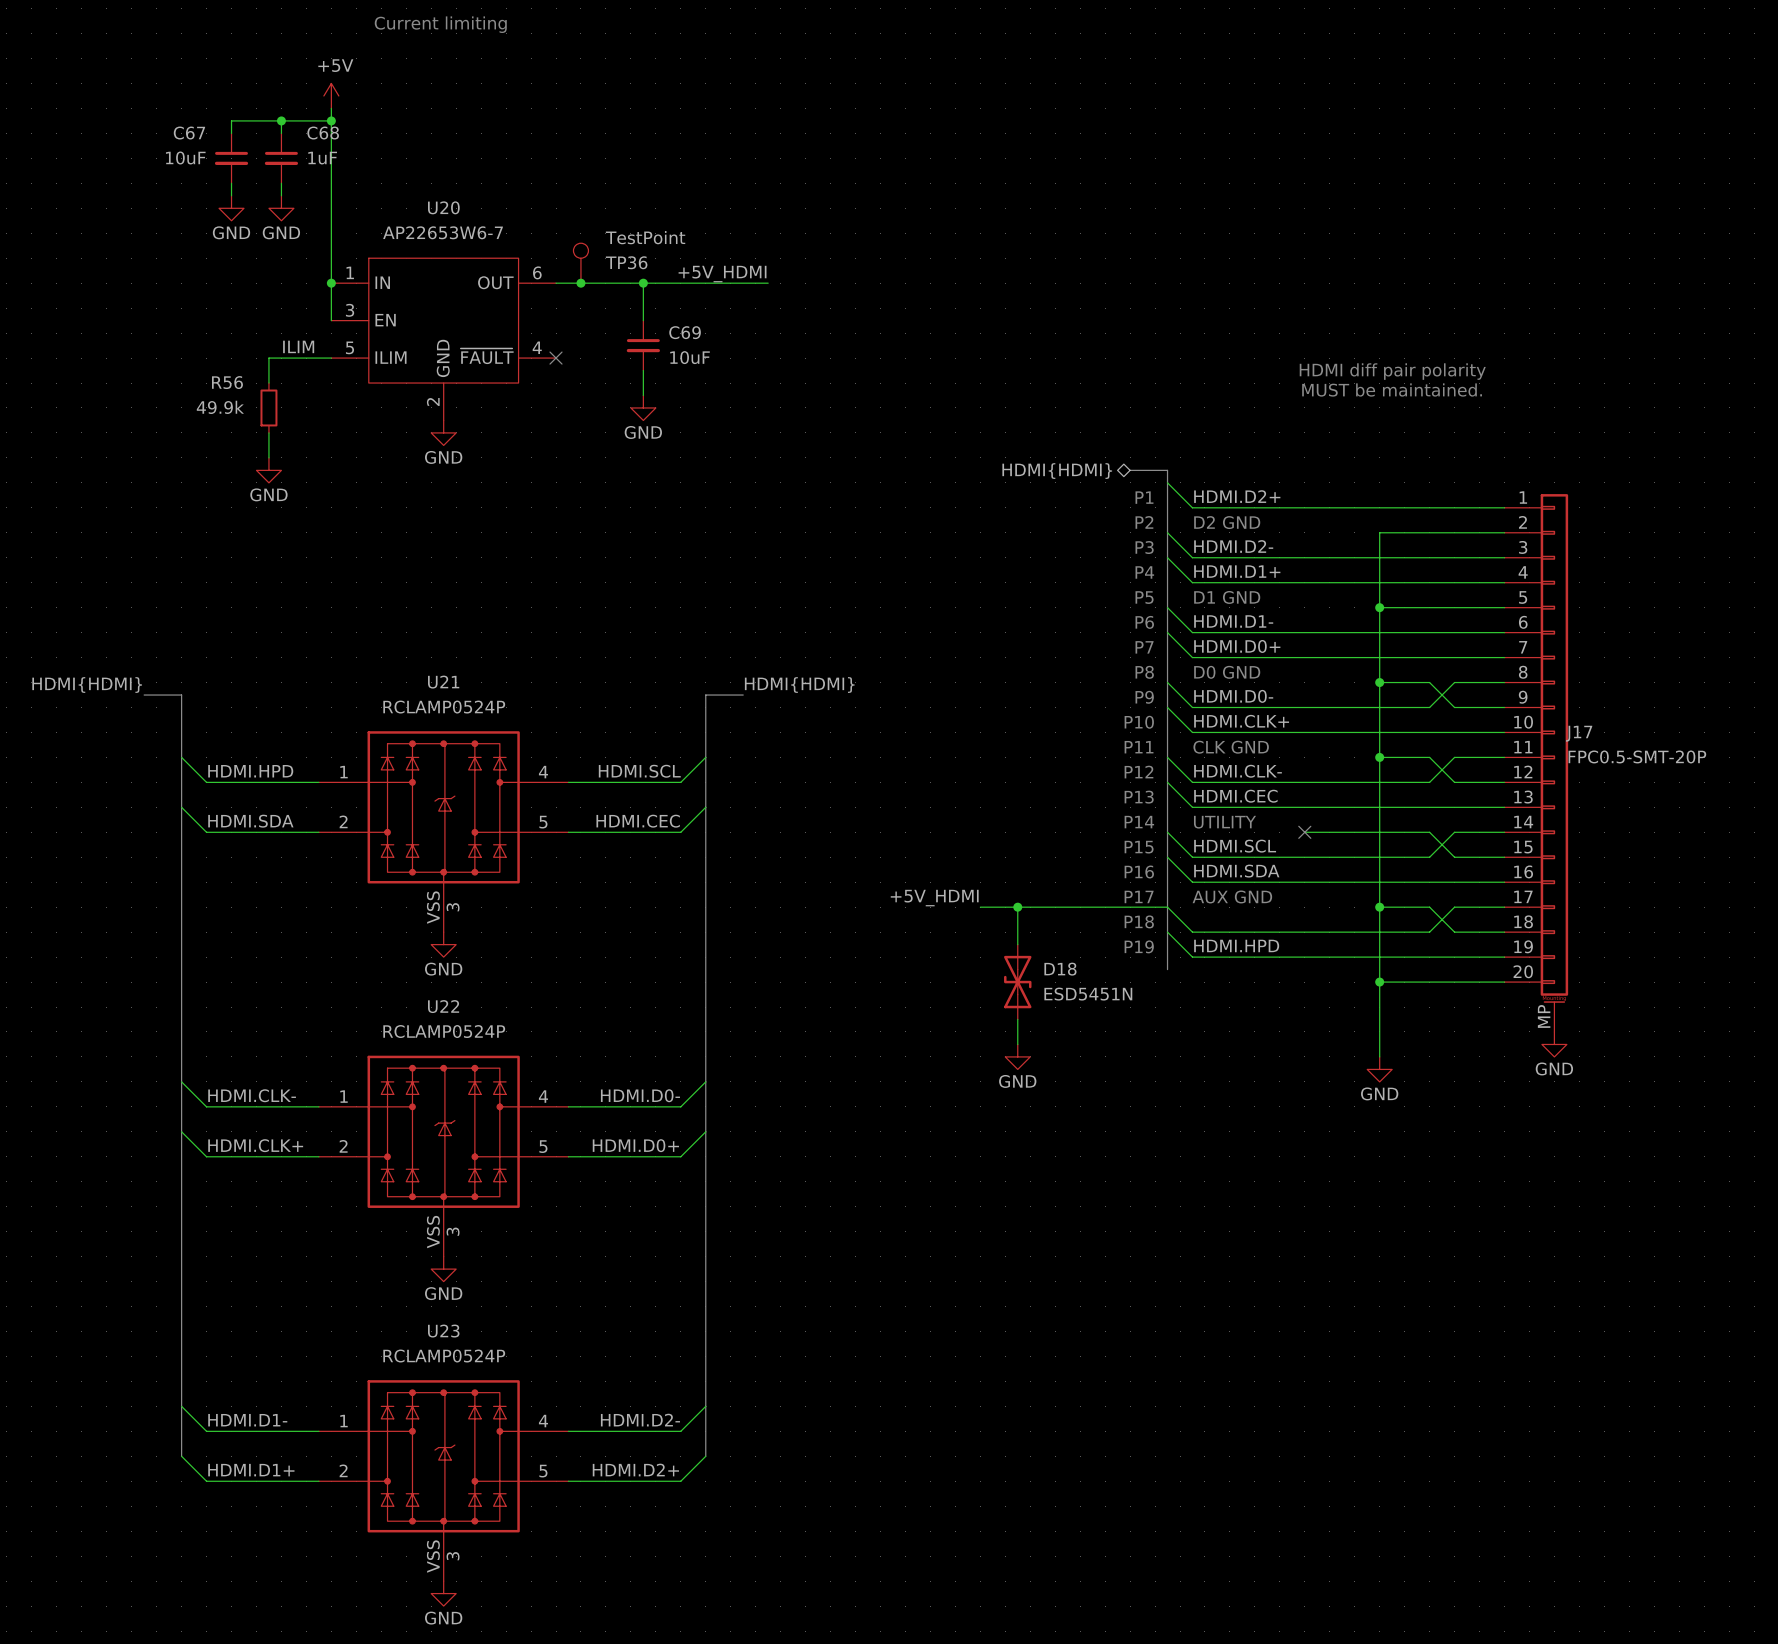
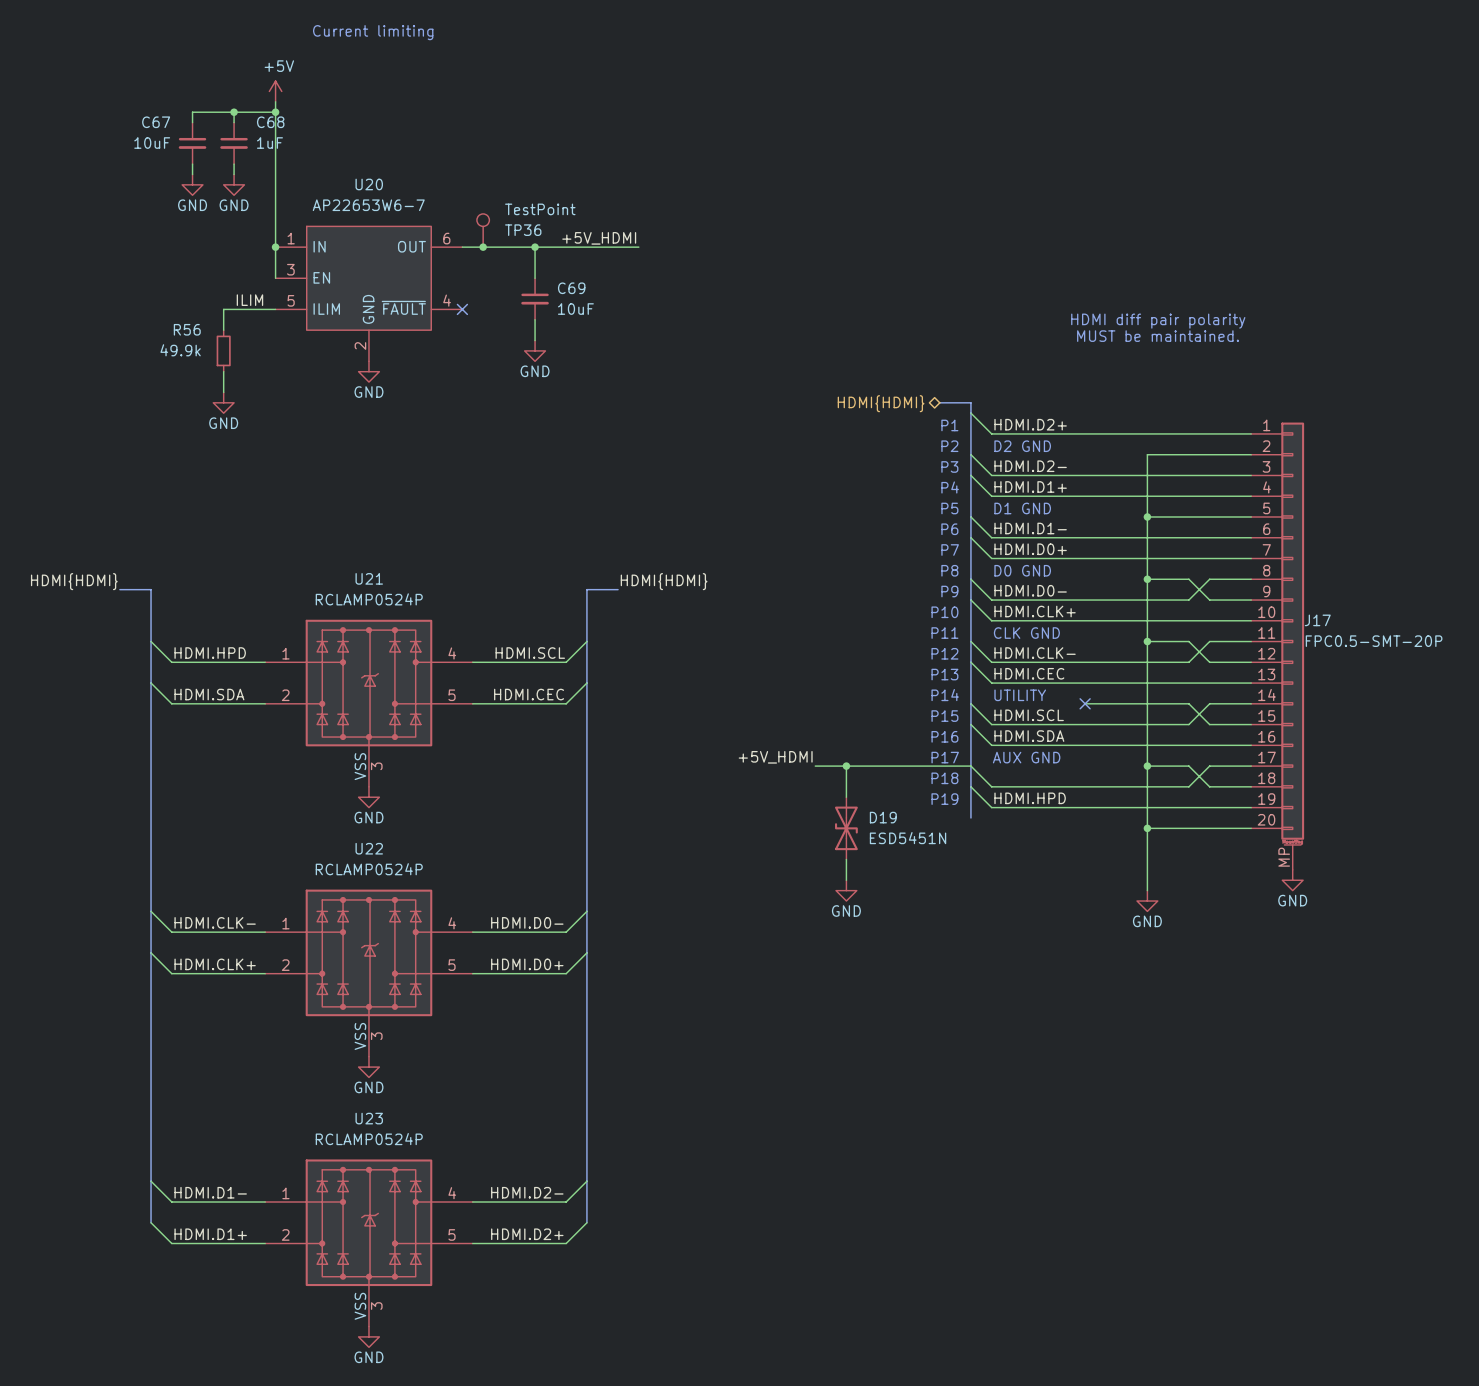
D18 name: D18 (1060, 969) -> D19 (883, 817)

